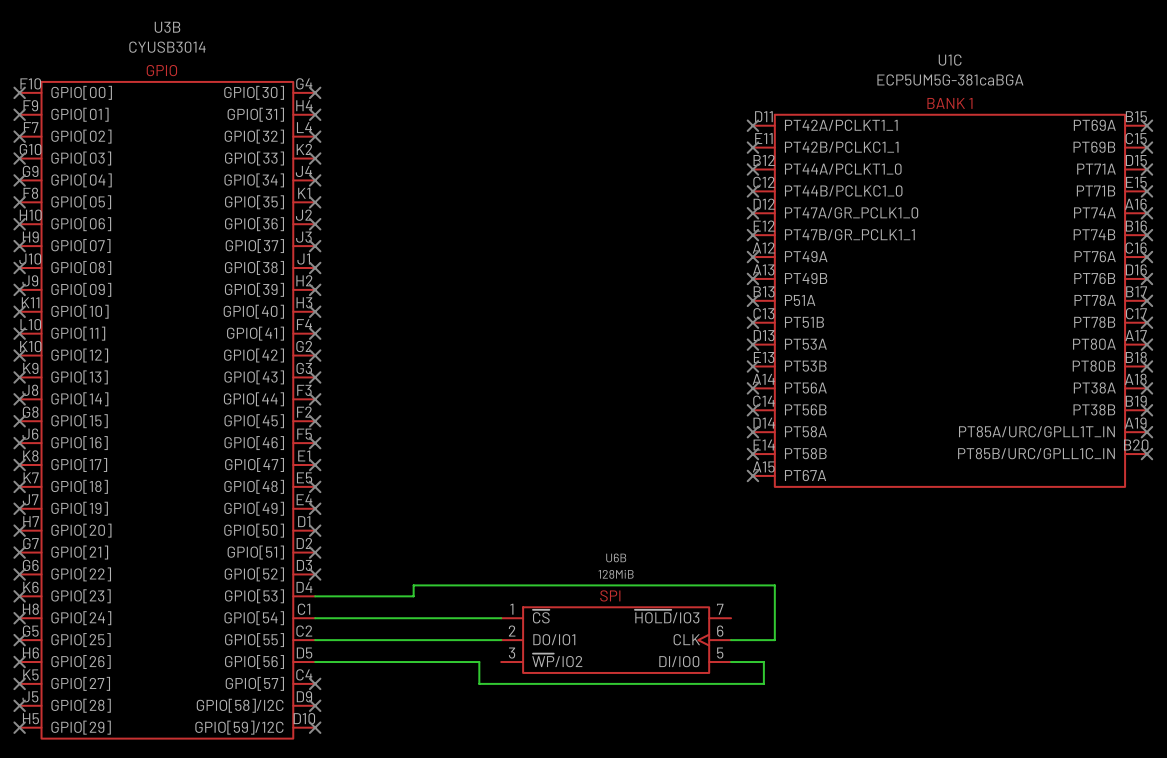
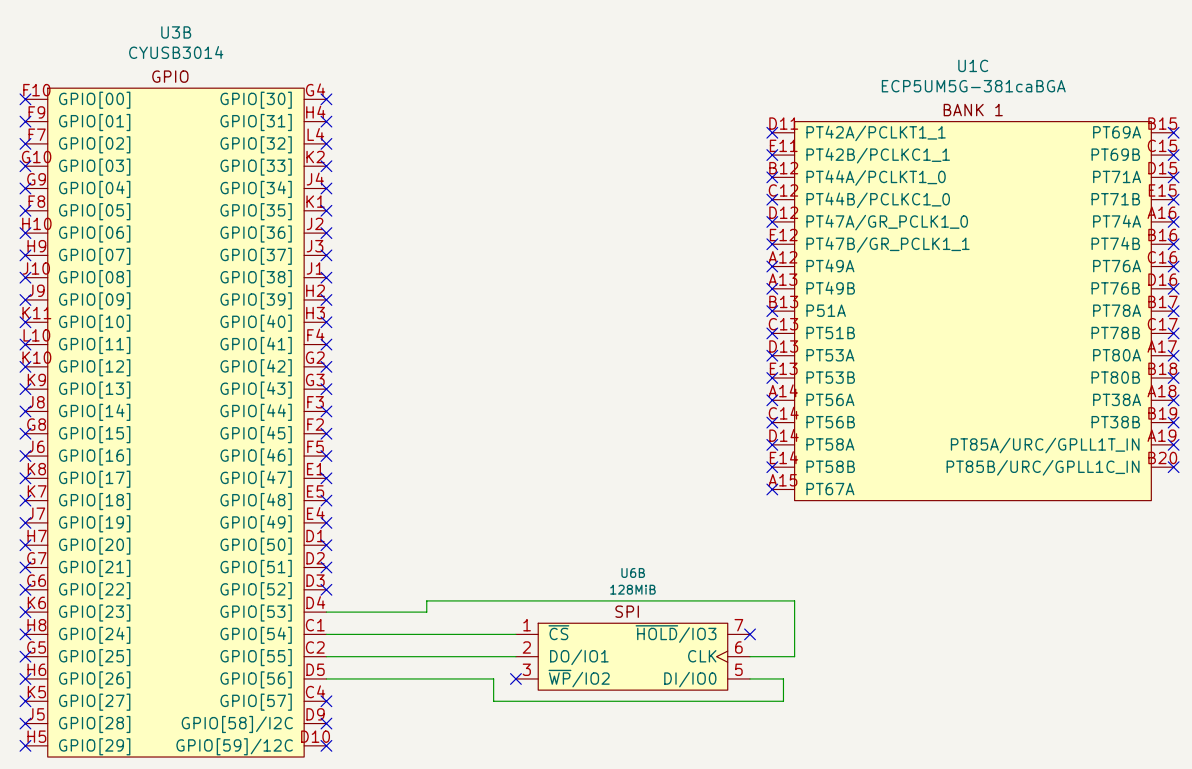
no-connect mark: none -> (750, 634)
no-connect mark: none -> (515, 678)

